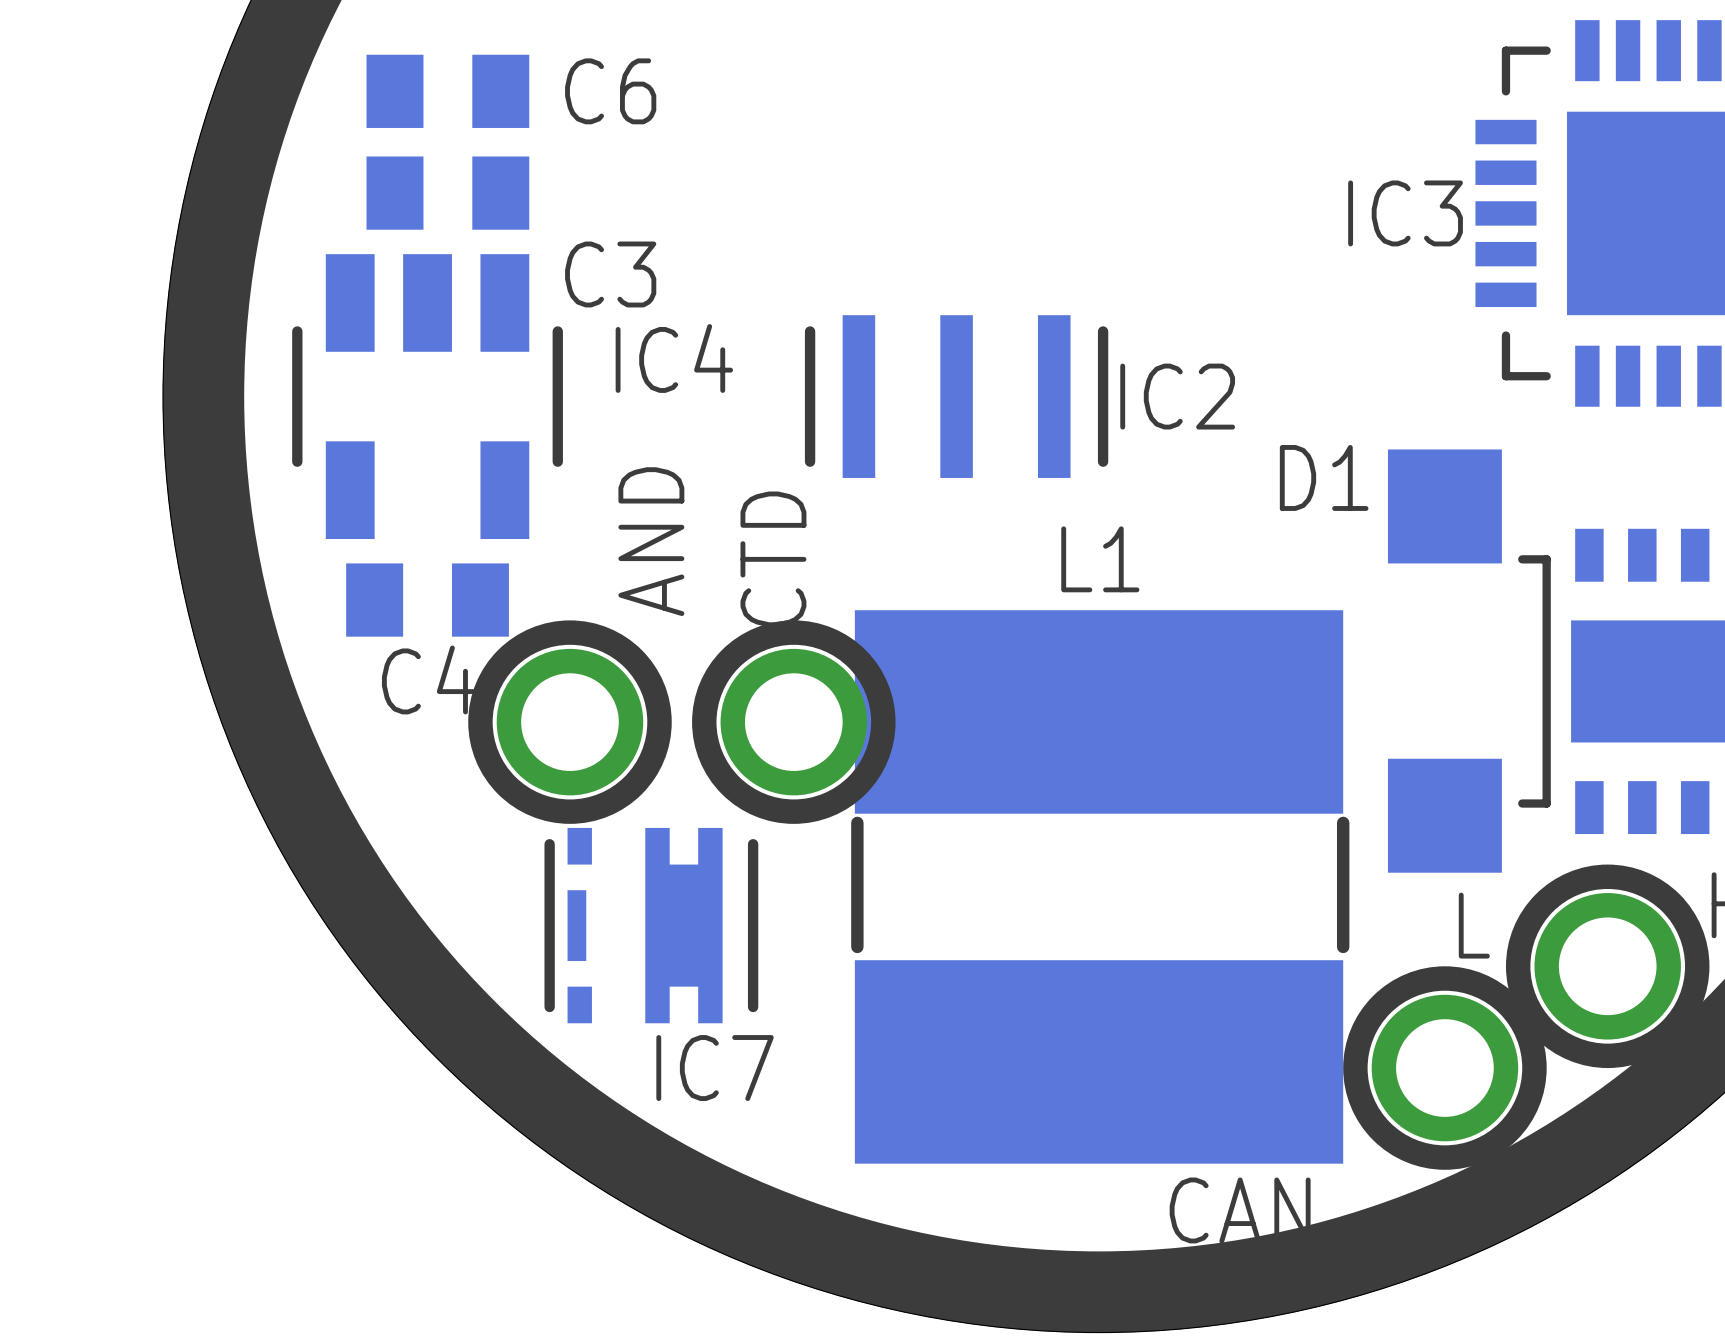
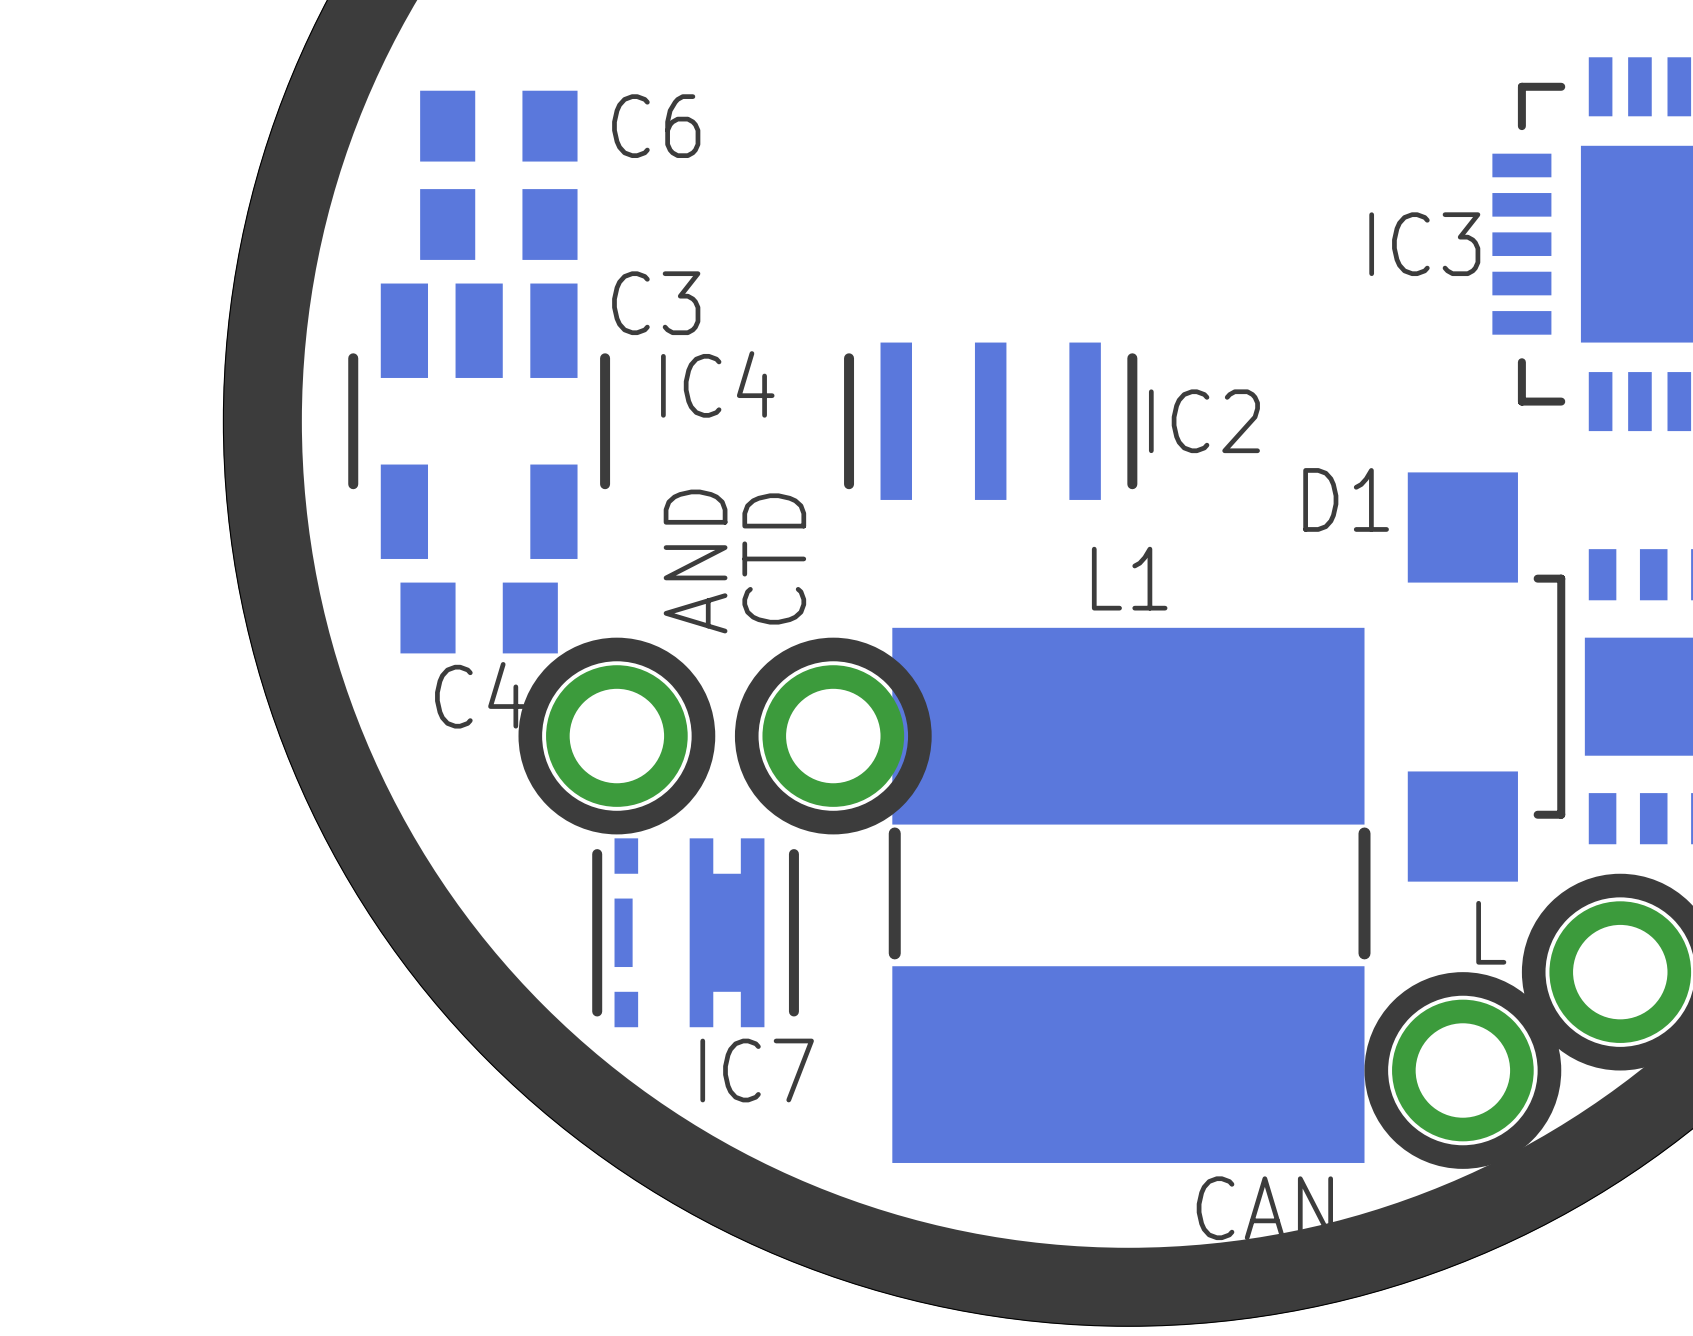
text position: CTD (773, 559) -> CTD (774, 558)

